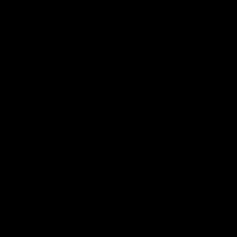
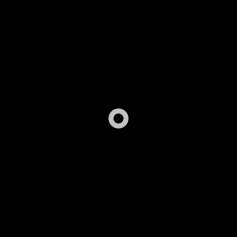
via: none -> (118, 118)

